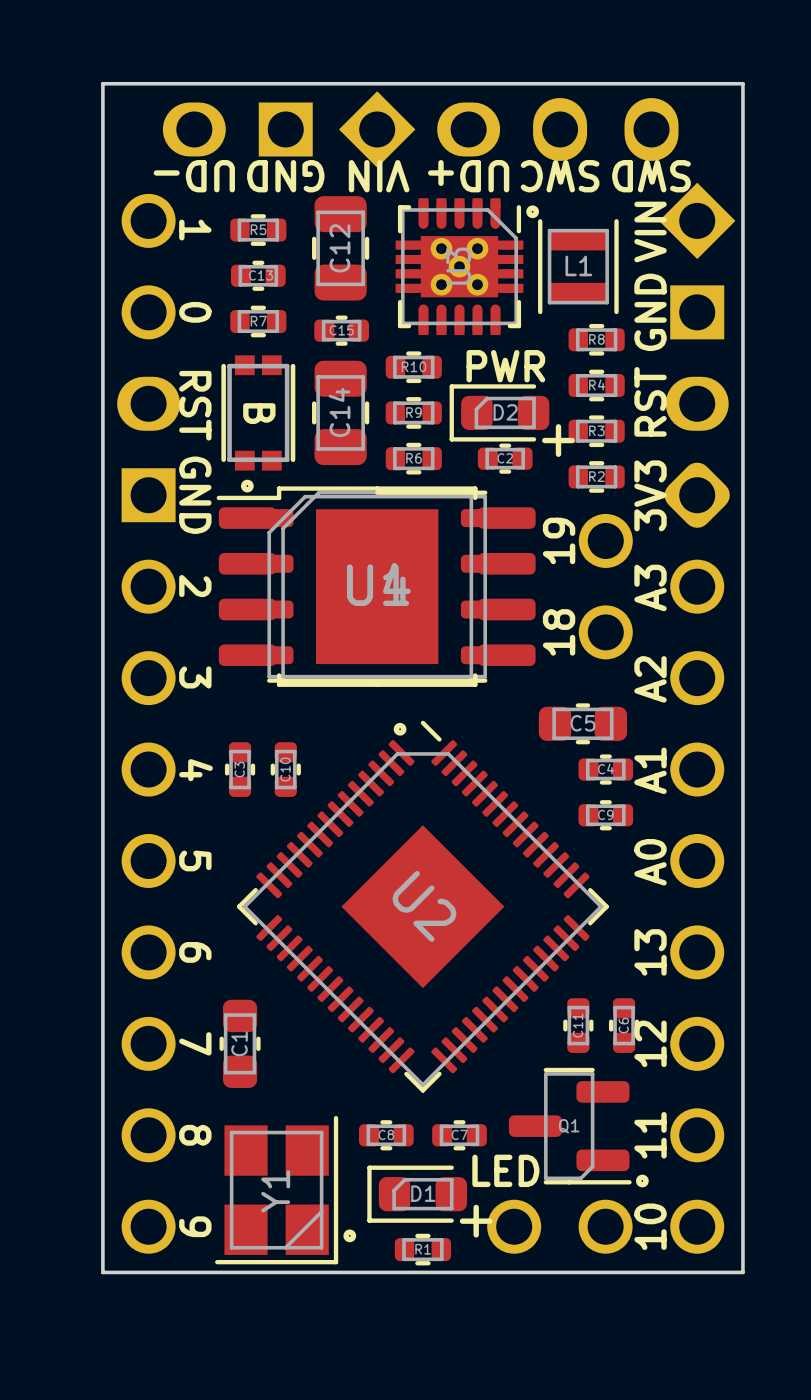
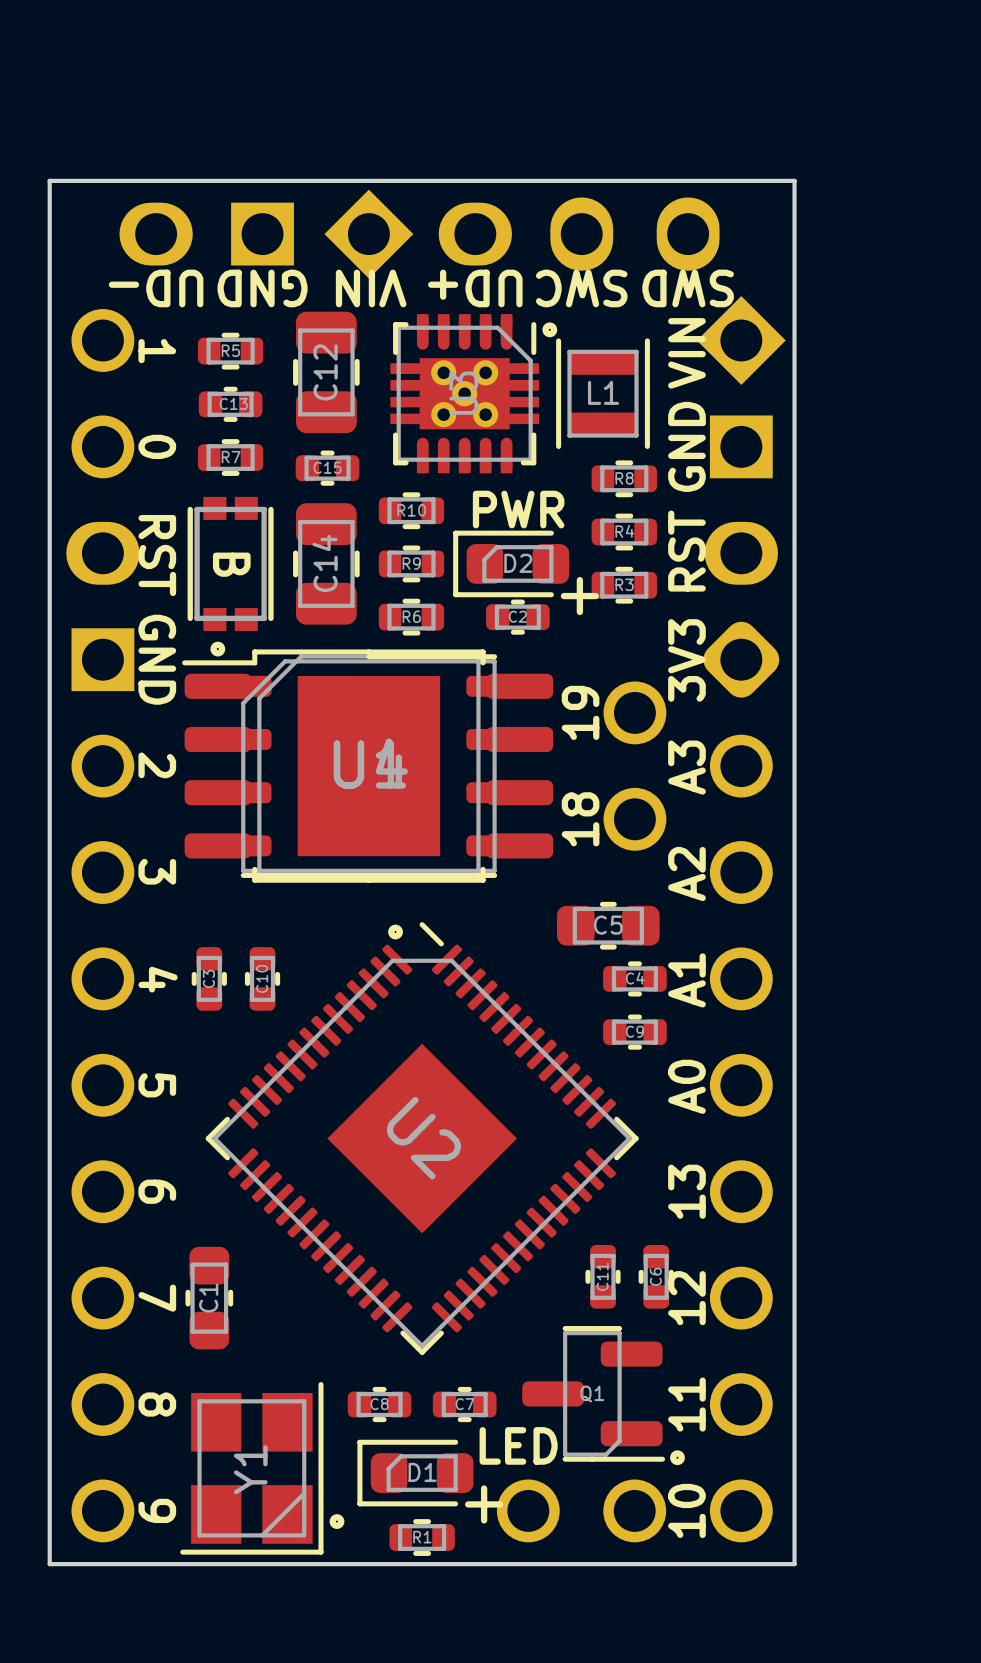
R2: (596, 476) -> none

